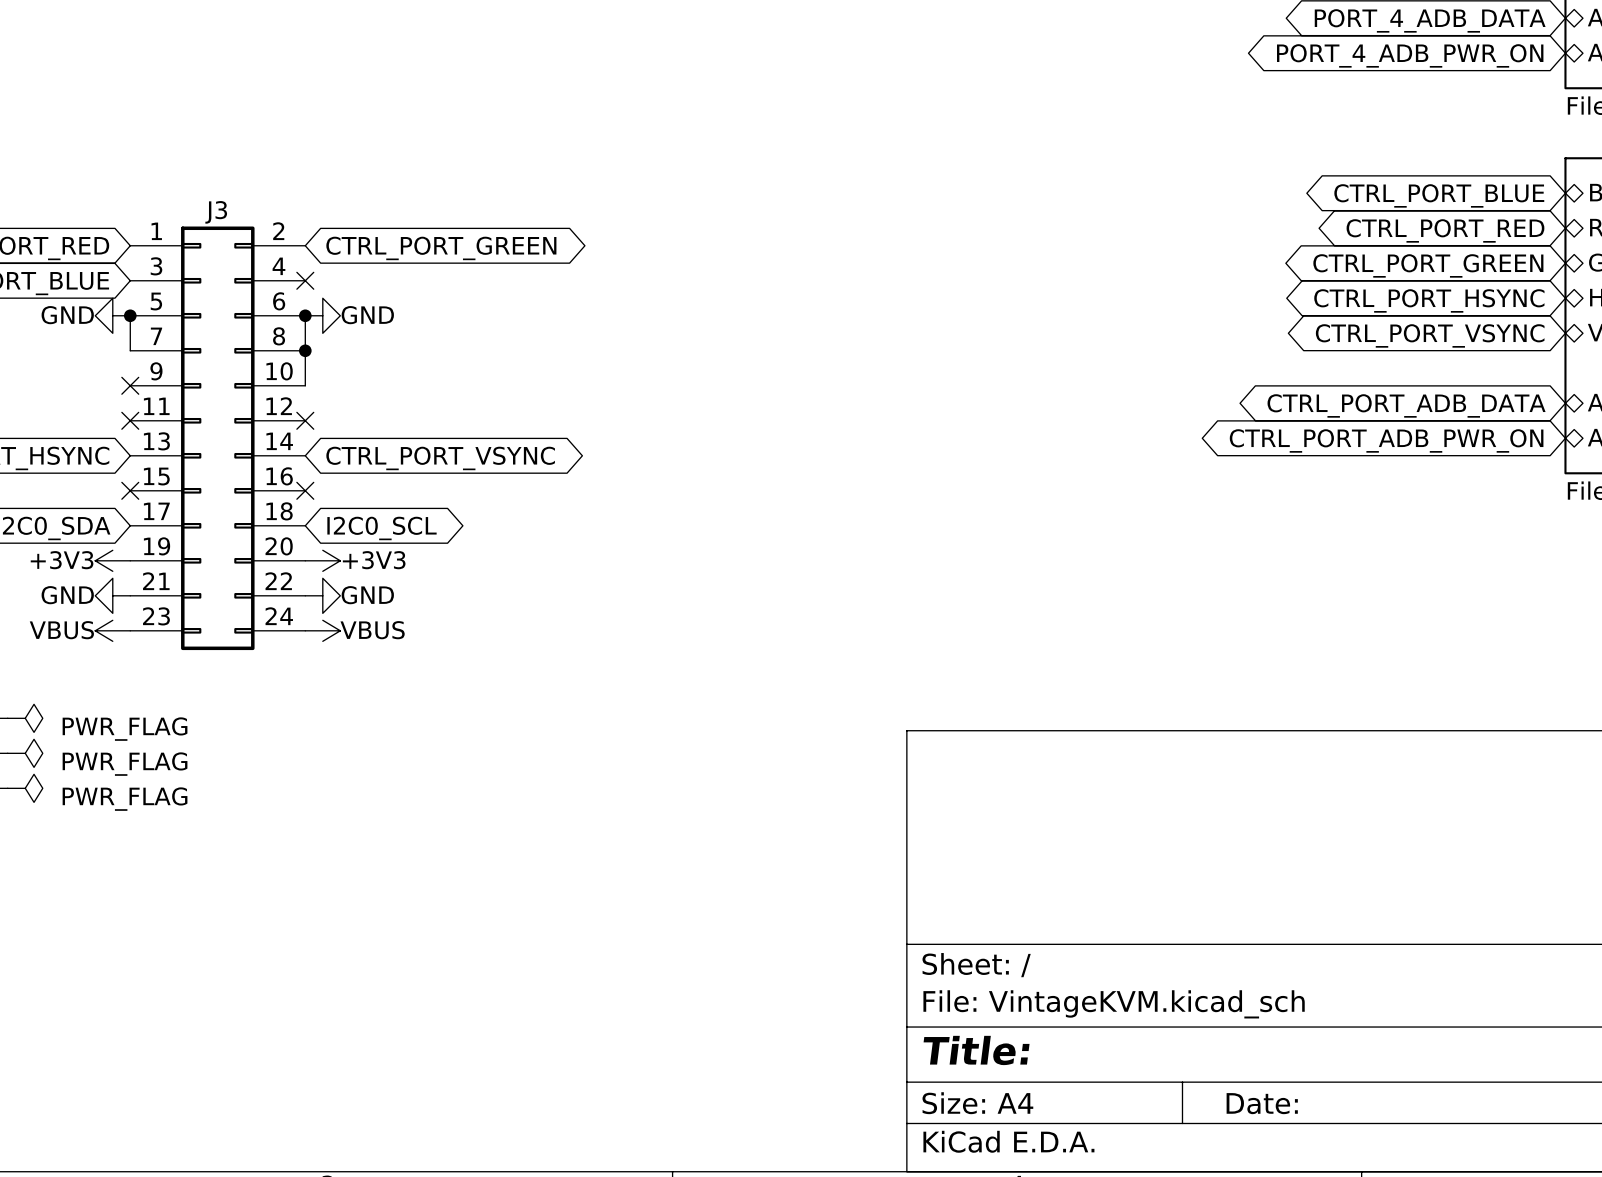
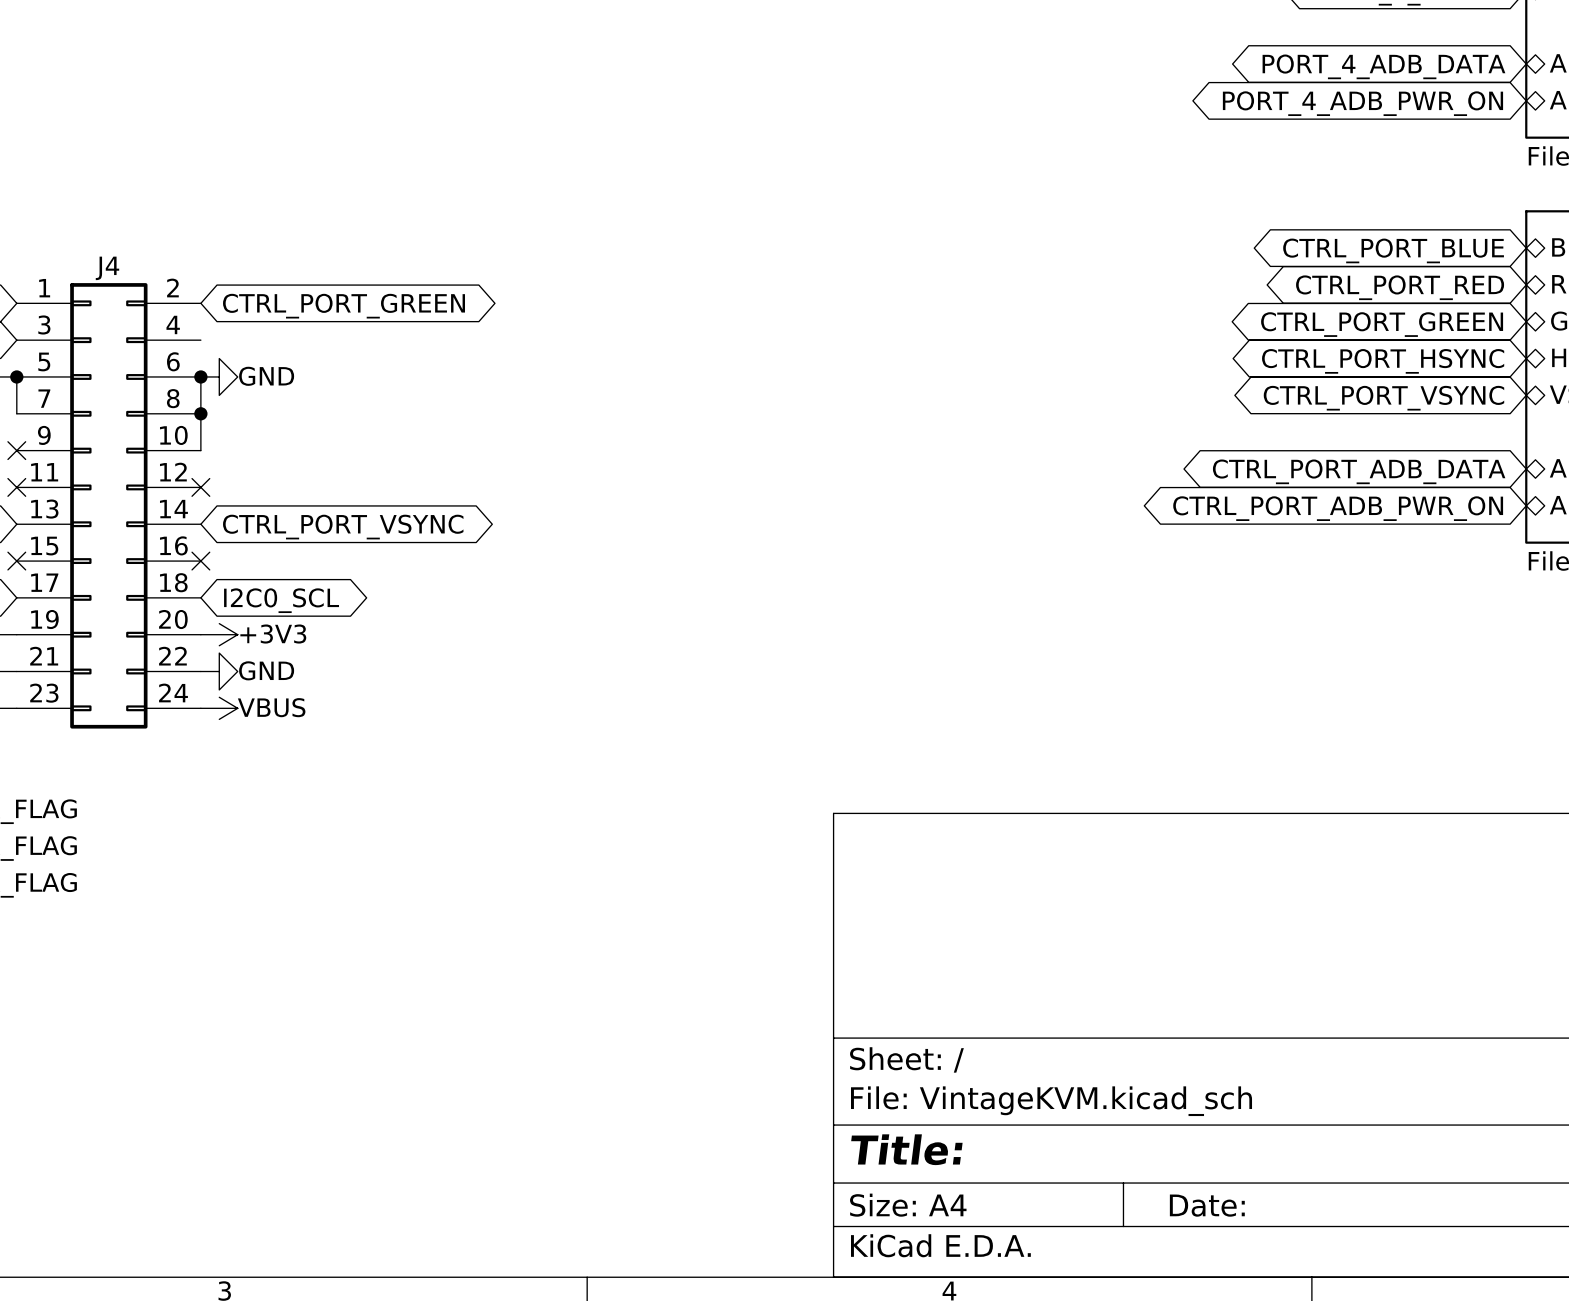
J3 name: J3 (216, 212) -> J4 (107, 268)
no-connect mark: (305, 280) -> none

